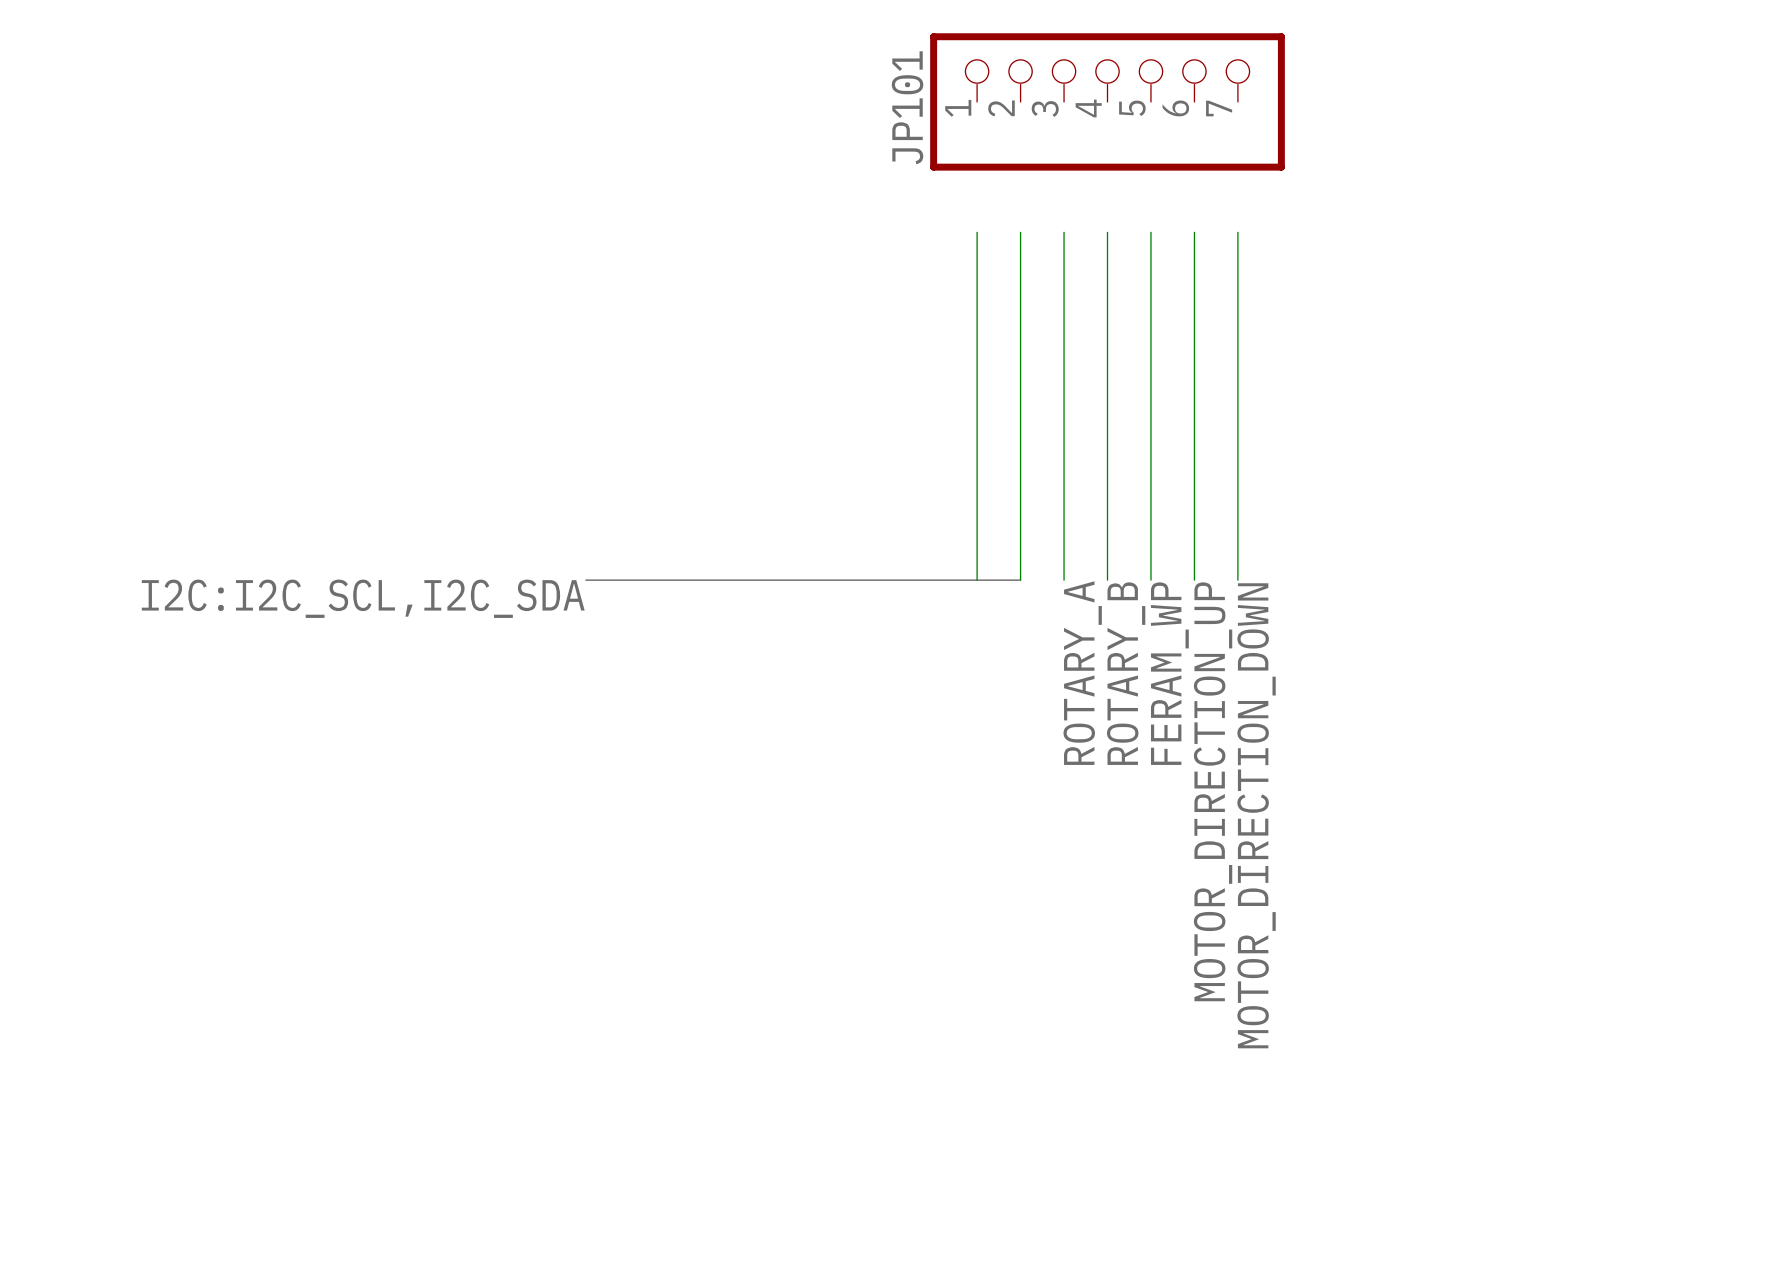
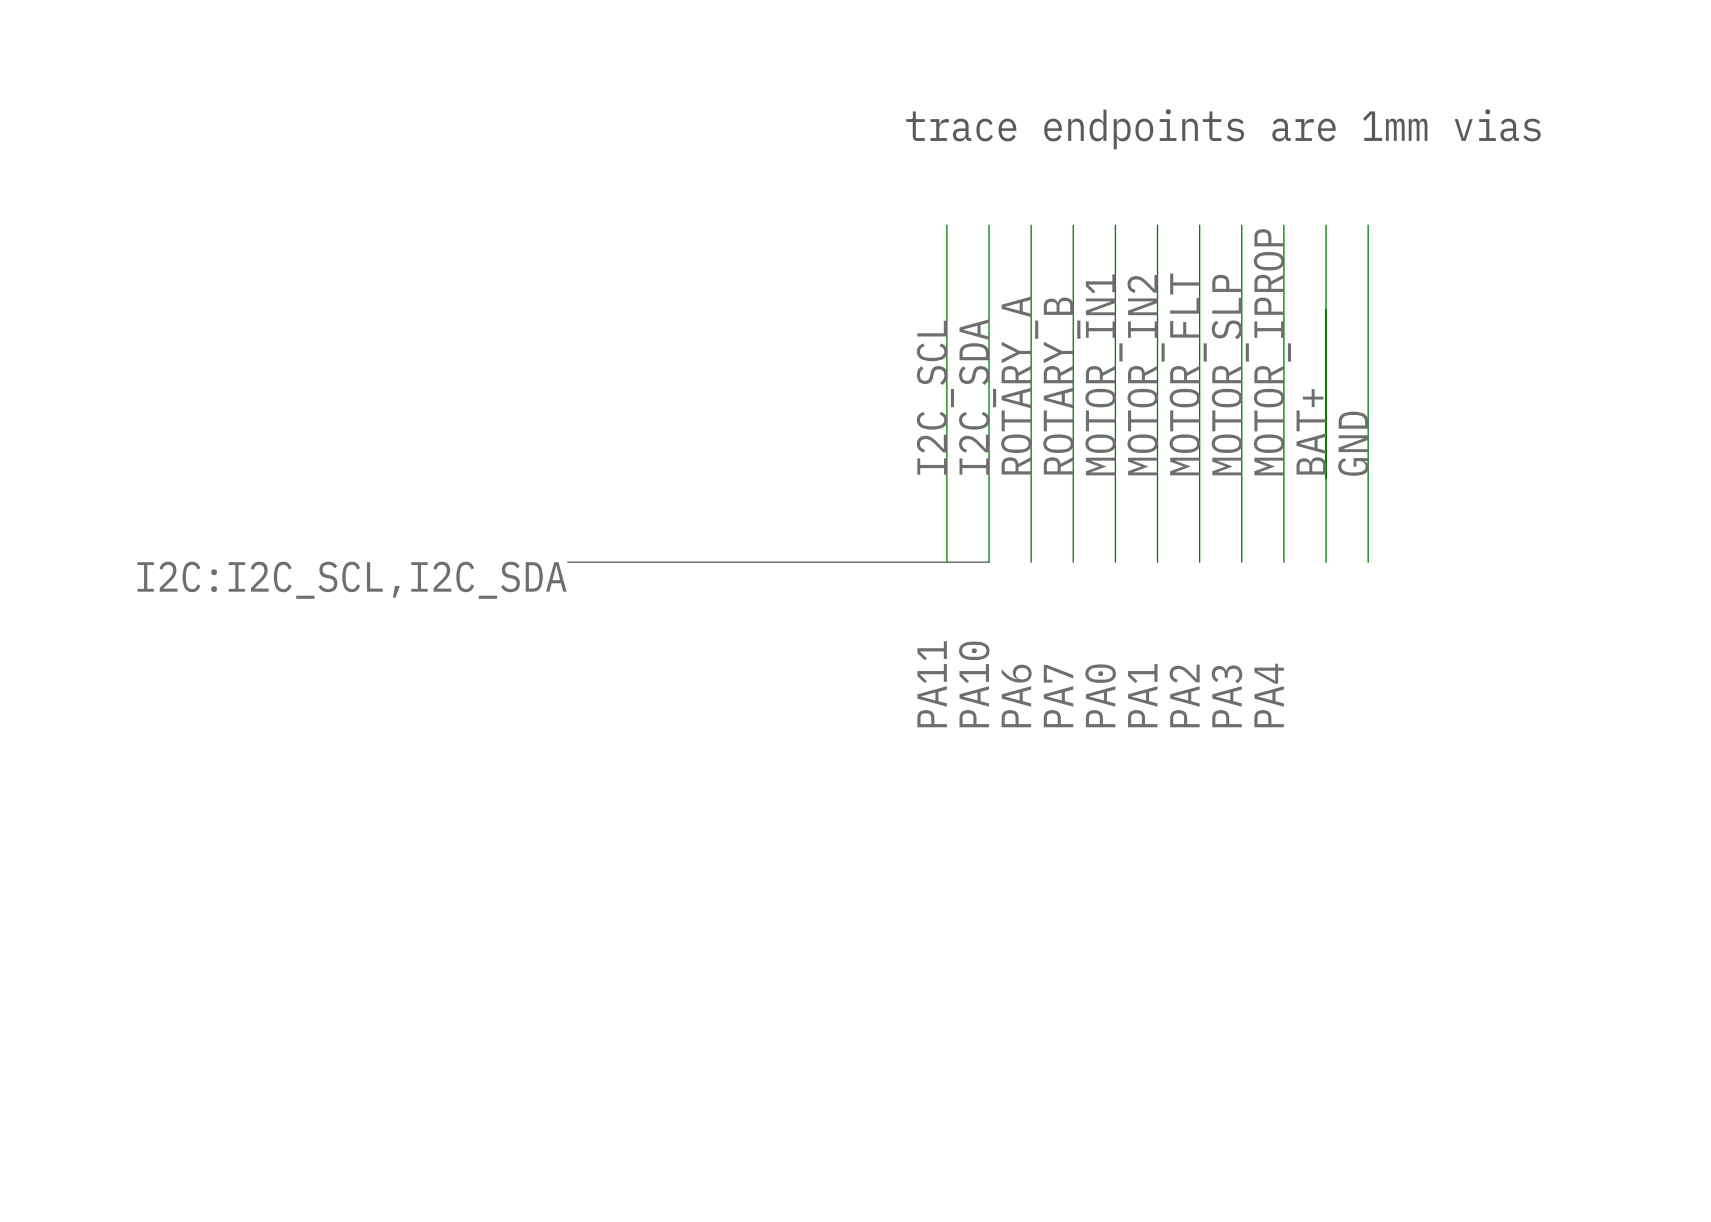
JP101: (1107, 101) -> none
text: none -> trace endpoints are 1mm vias (1223, 129)
wire: none -> (1241, 225) (1241, 562)
wire: none -> (1283, 225) (1283, 562)
wire: none -> (1326, 225) (1326, 562)
wire: none -> (1368, 225) (1368, 562)
label: none -> MOTOR_IPROP (1272, 352)
label: none -> MOTOR_IN1 (1103, 374)
label: none -> MOTOR_FLT (1188, 374)
label: none -> MOTOR_IN2 (1146, 375)
label: none -> MOTOR_SLP (1230, 375)
label: none -> I2C_SDA (977, 397)
label: none -> I2C_SCL (935, 397)
label: none -> BAT+ (1311, 431)
label: none -> GND (1353, 443)
label position: ROTARY_A (1082, 673) -> ROTARY_A (1019, 385)
label position: ROTARY_B (1126, 673) -> ROTARY_B (1061, 386)
label: FERAM_WP (1169, 673) -> none
text: none -> PA11 (932, 684)
text: none -> PA10 (974, 684)
text: none -> PA1 (1142, 695)
text: none -> PA4 (1269, 695)
text: none -> PA6 (1016, 695)
text: none -> PA7 (1058, 696)
text: none -> PA0 (1100, 695)
text: none -> PA2 (1184, 695)
text: none -> PA3 (1227, 696)
label: MOTOR_DIRECTION_UP (1213, 791) -> none
label: MOTOR_DIRECTION_DOWN (1256, 815) -> none

